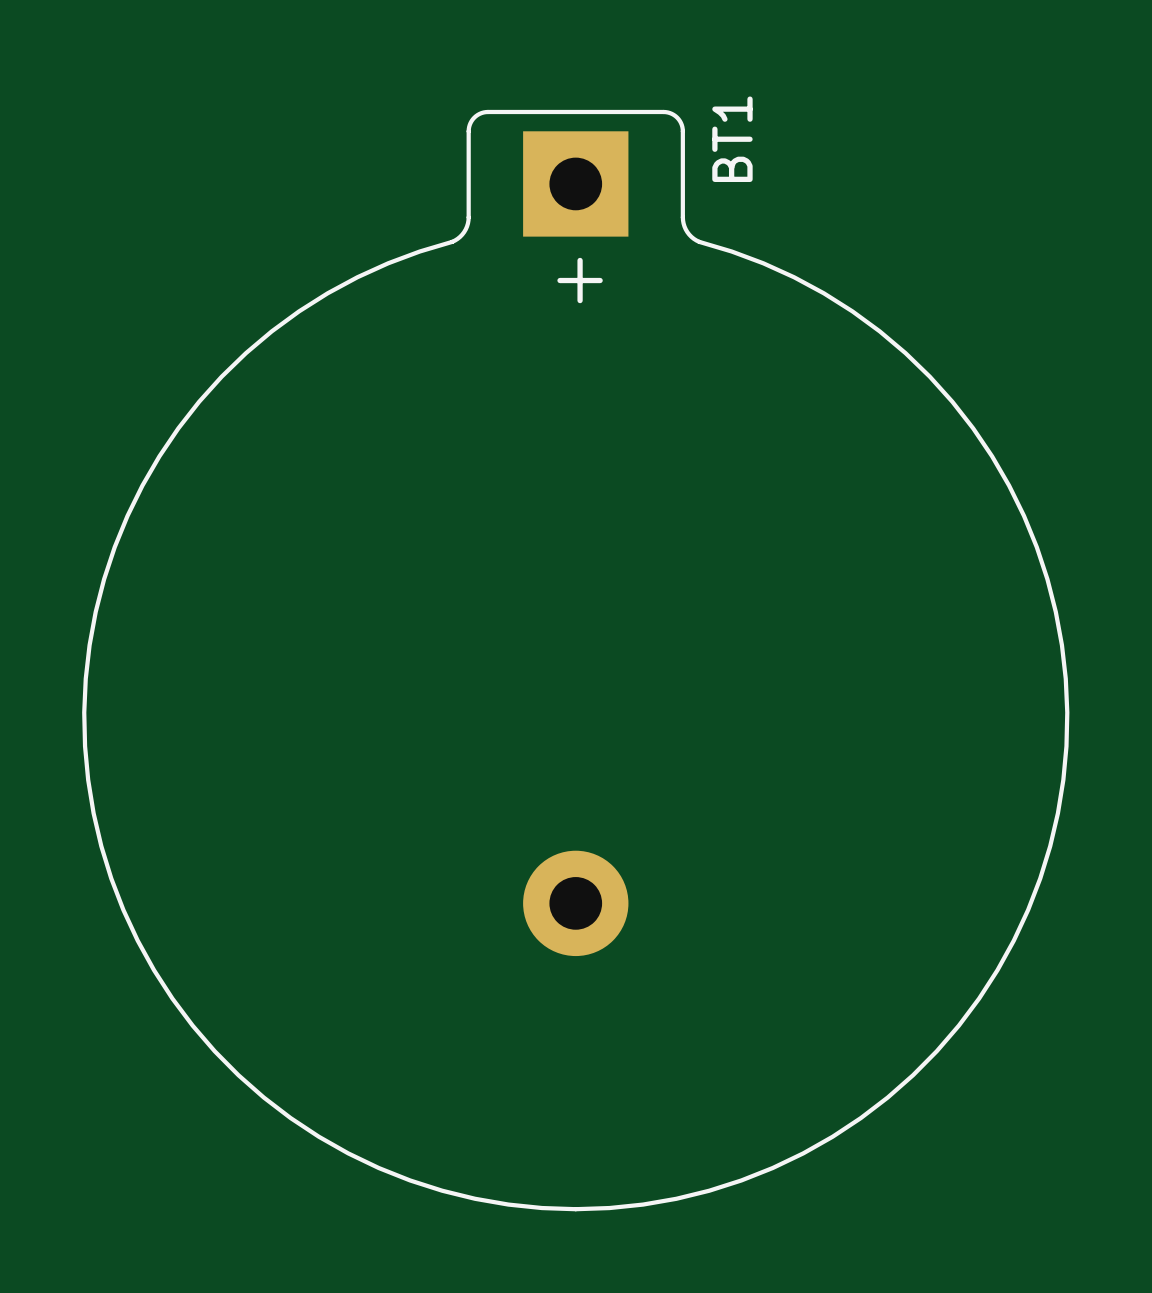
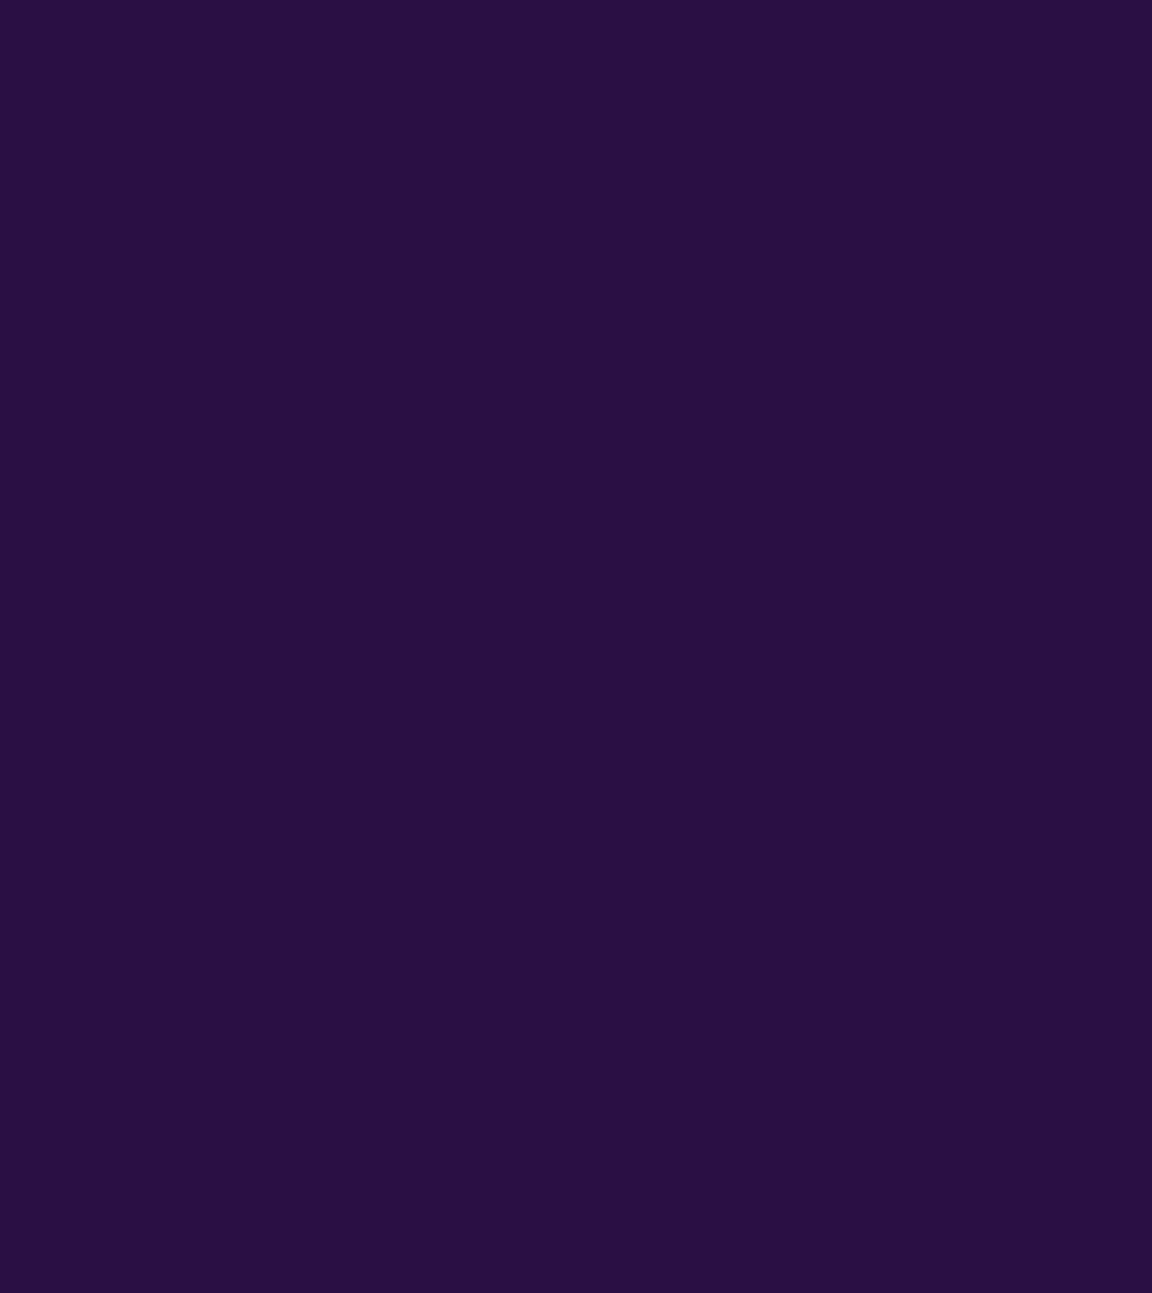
BT1: (575, 660) -> none

